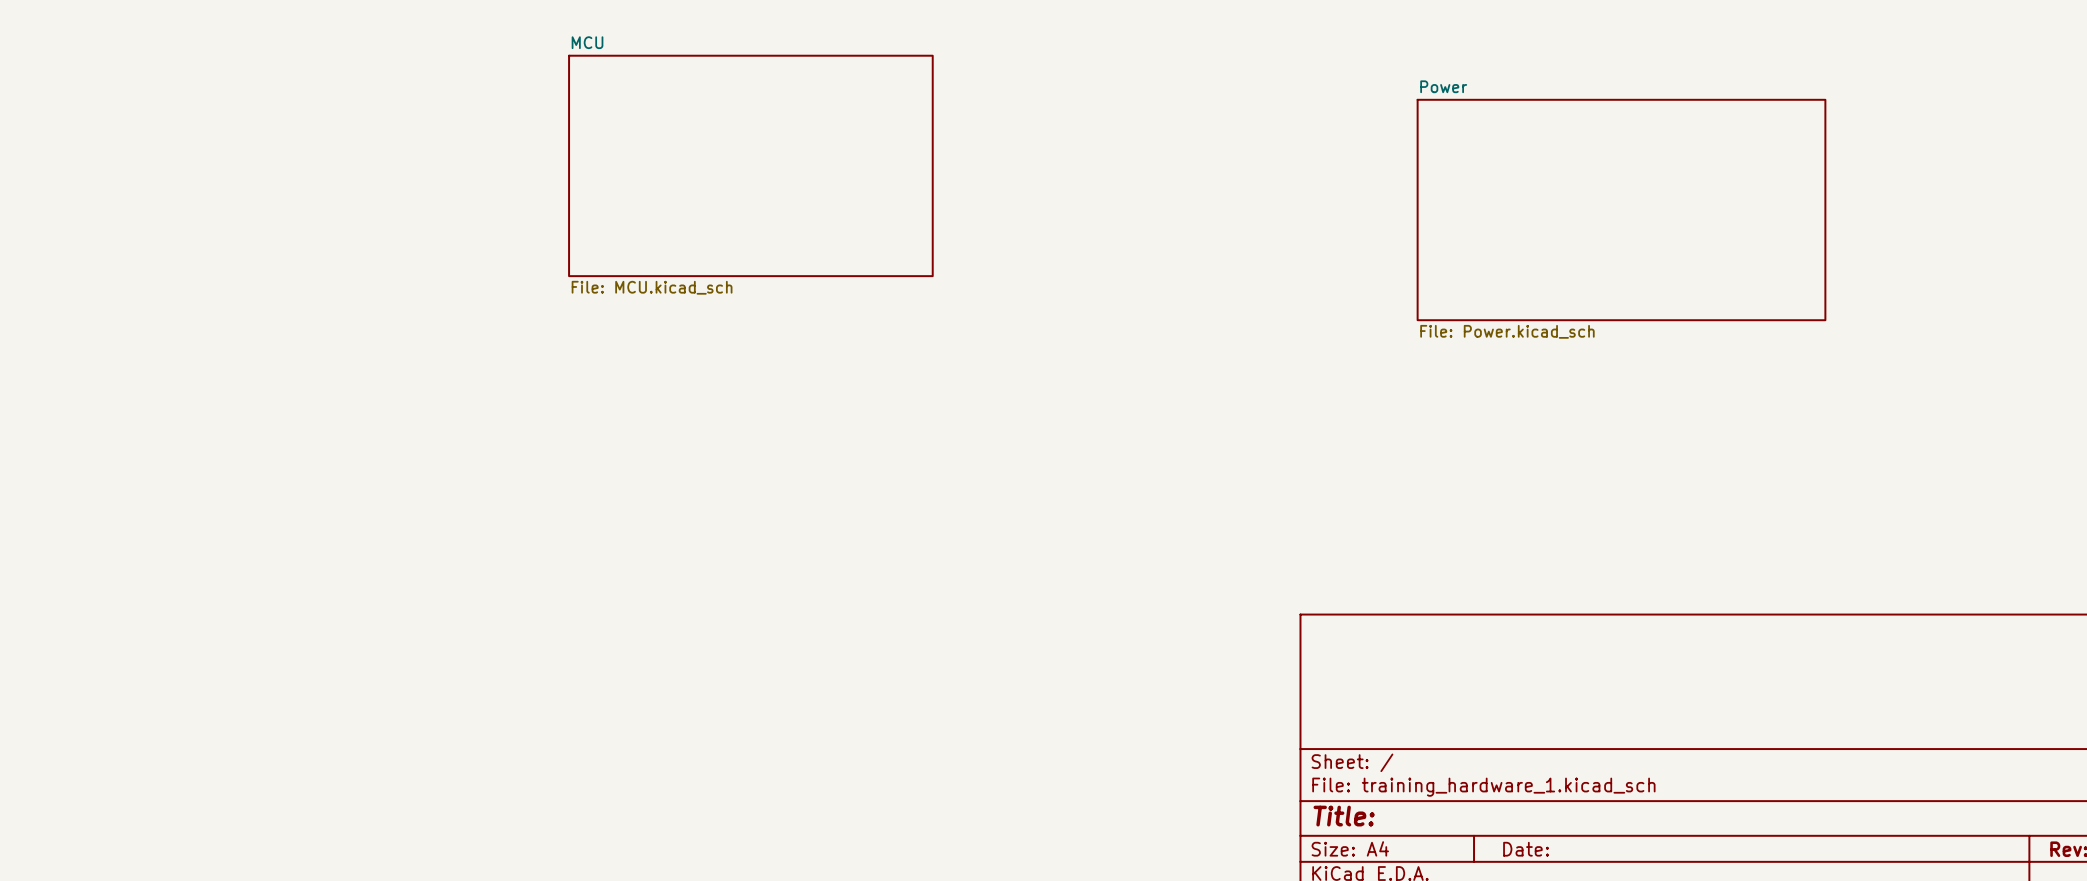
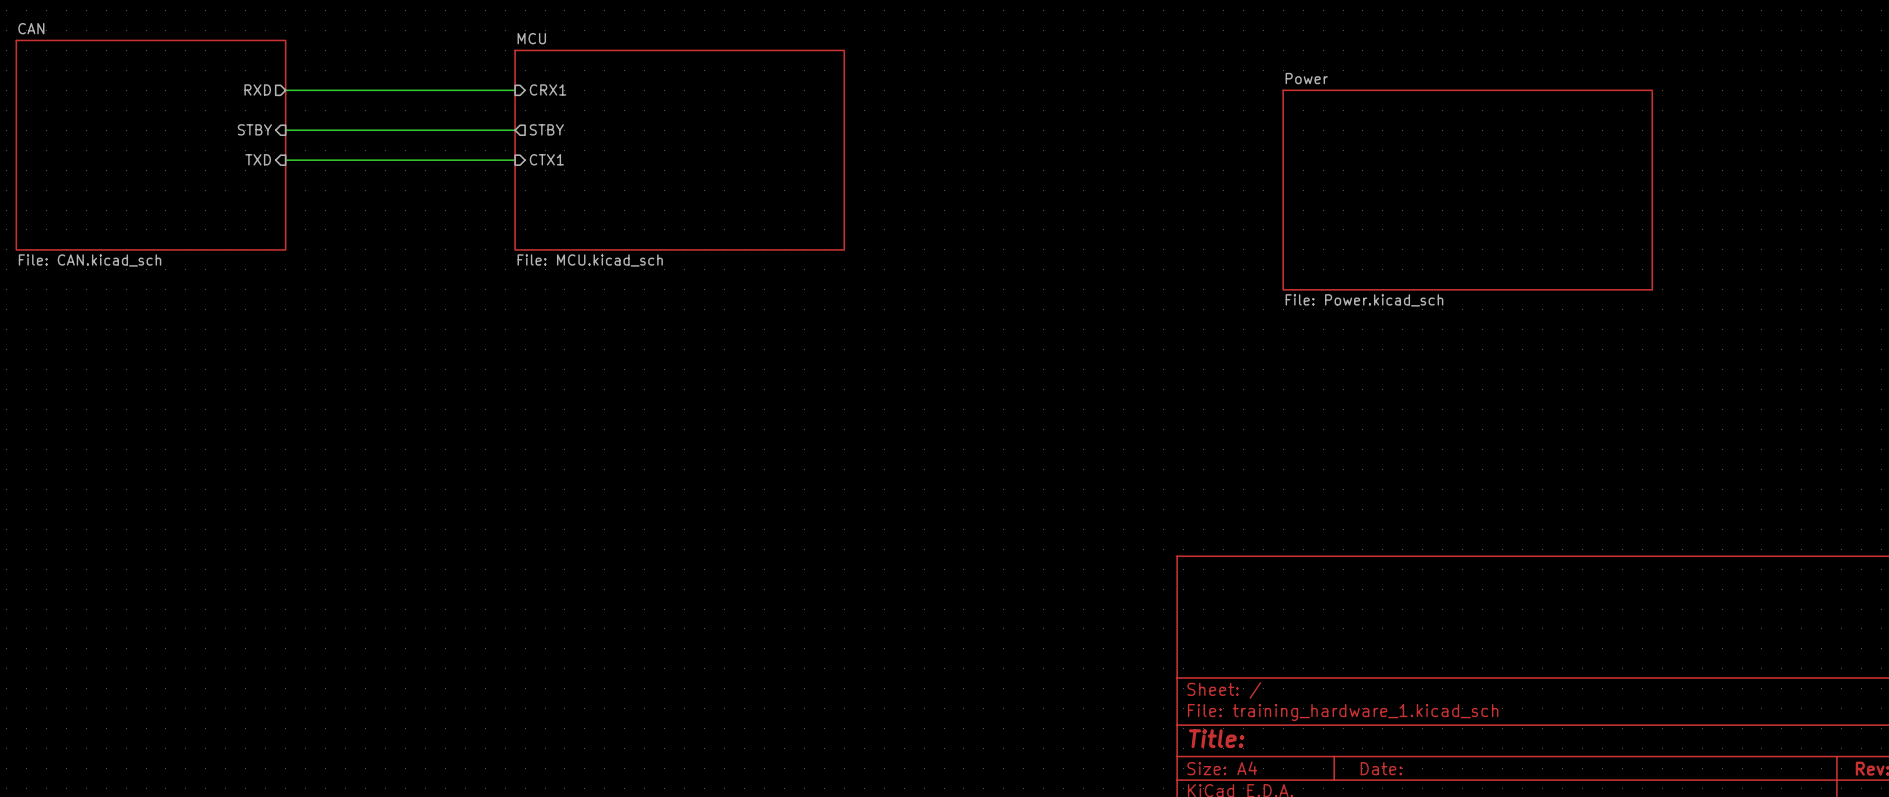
sheet pin: none -> RXD (257, 89)
wire: none -> (285, 90) (515, 90)
sheet pin: none -> CRX1 (548, 89)
sheet pin: none -> STBY (254, 129)
wire: none -> (285, 130) (515, 130)
sheet pin: none -> STBY (546, 129)
sheet CAN: none -> File: CAN.kicad_sch (151, 145)
sheet pin: none -> TXD (258, 159)
wire: none -> (285, 160) (515, 160)
sheet pin: none -> CTX1 (546, 159)

